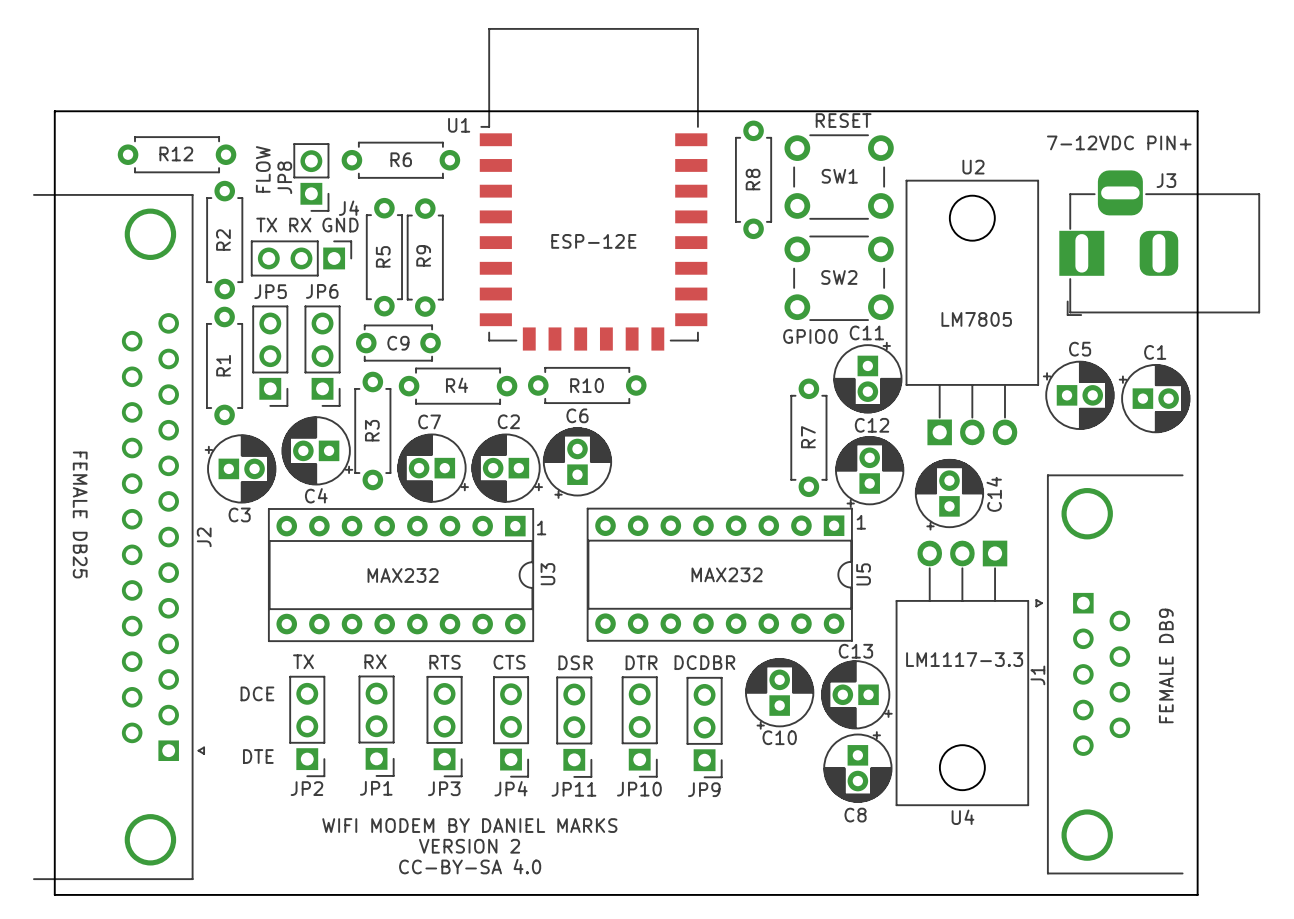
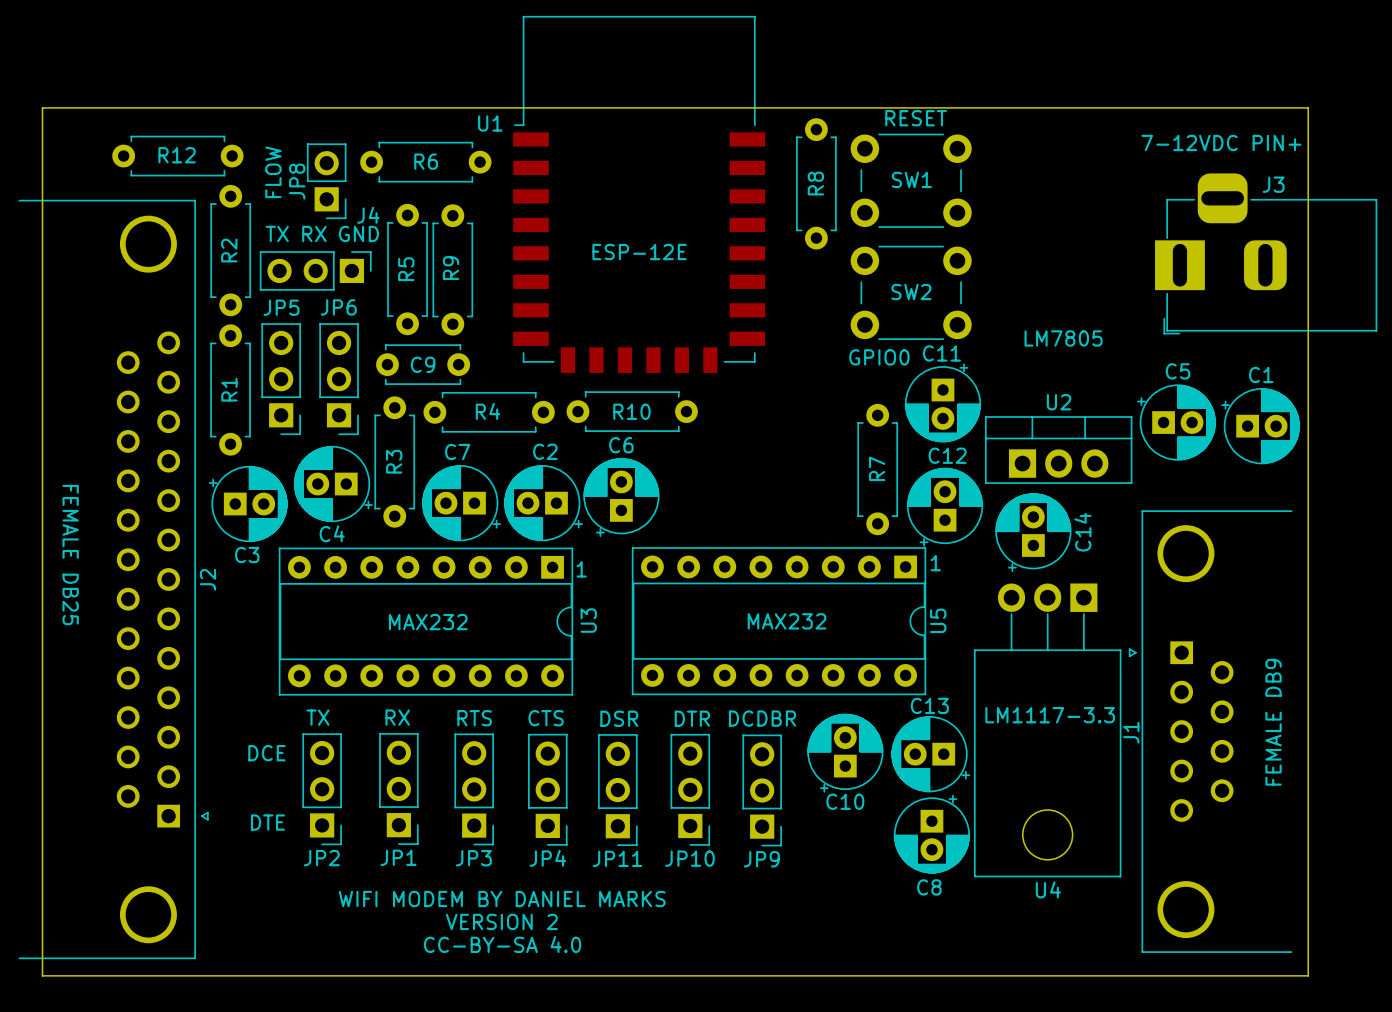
U2 name position: U2 (973, 167) -> U2 (1059, 402)
U2 footprint: [905, 179, 1039, 446] -> [984, 416, 1133, 484]

